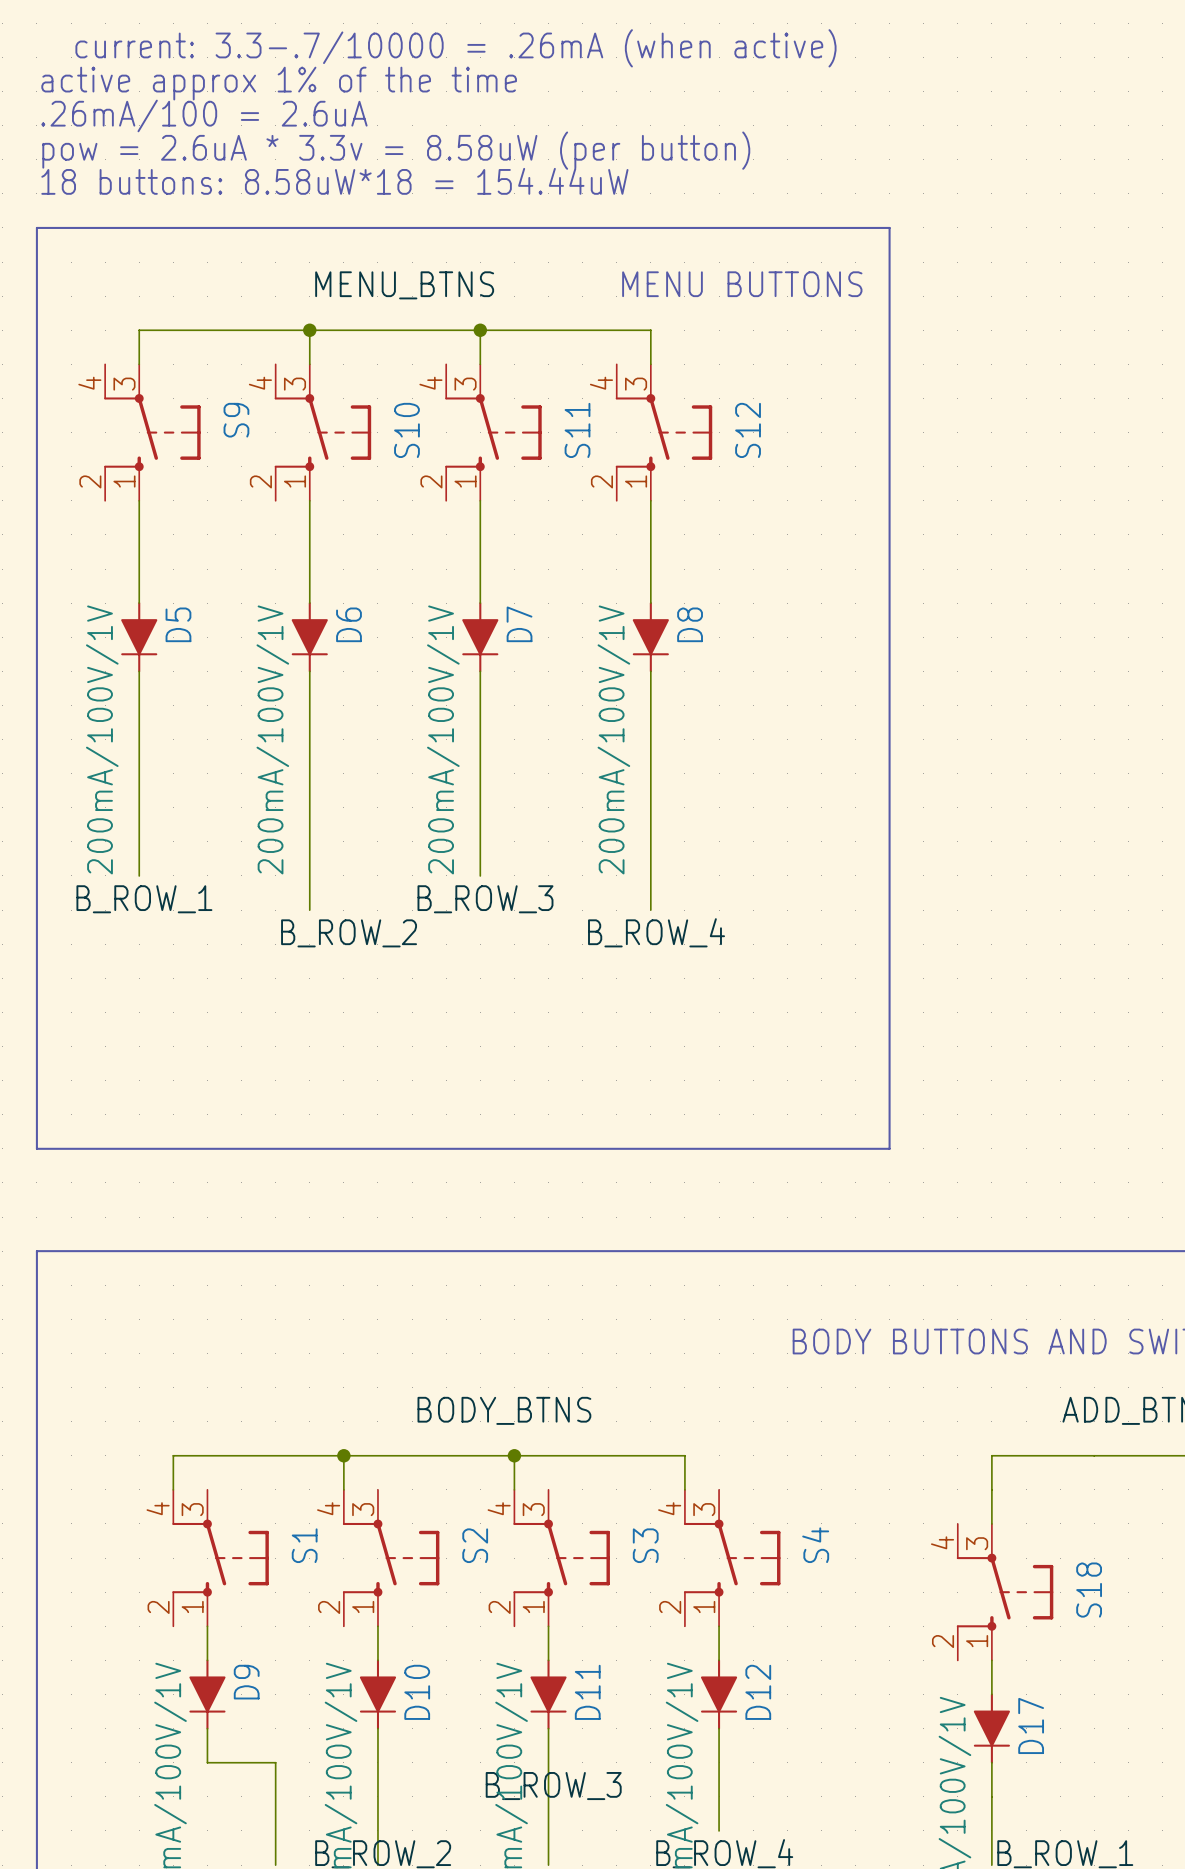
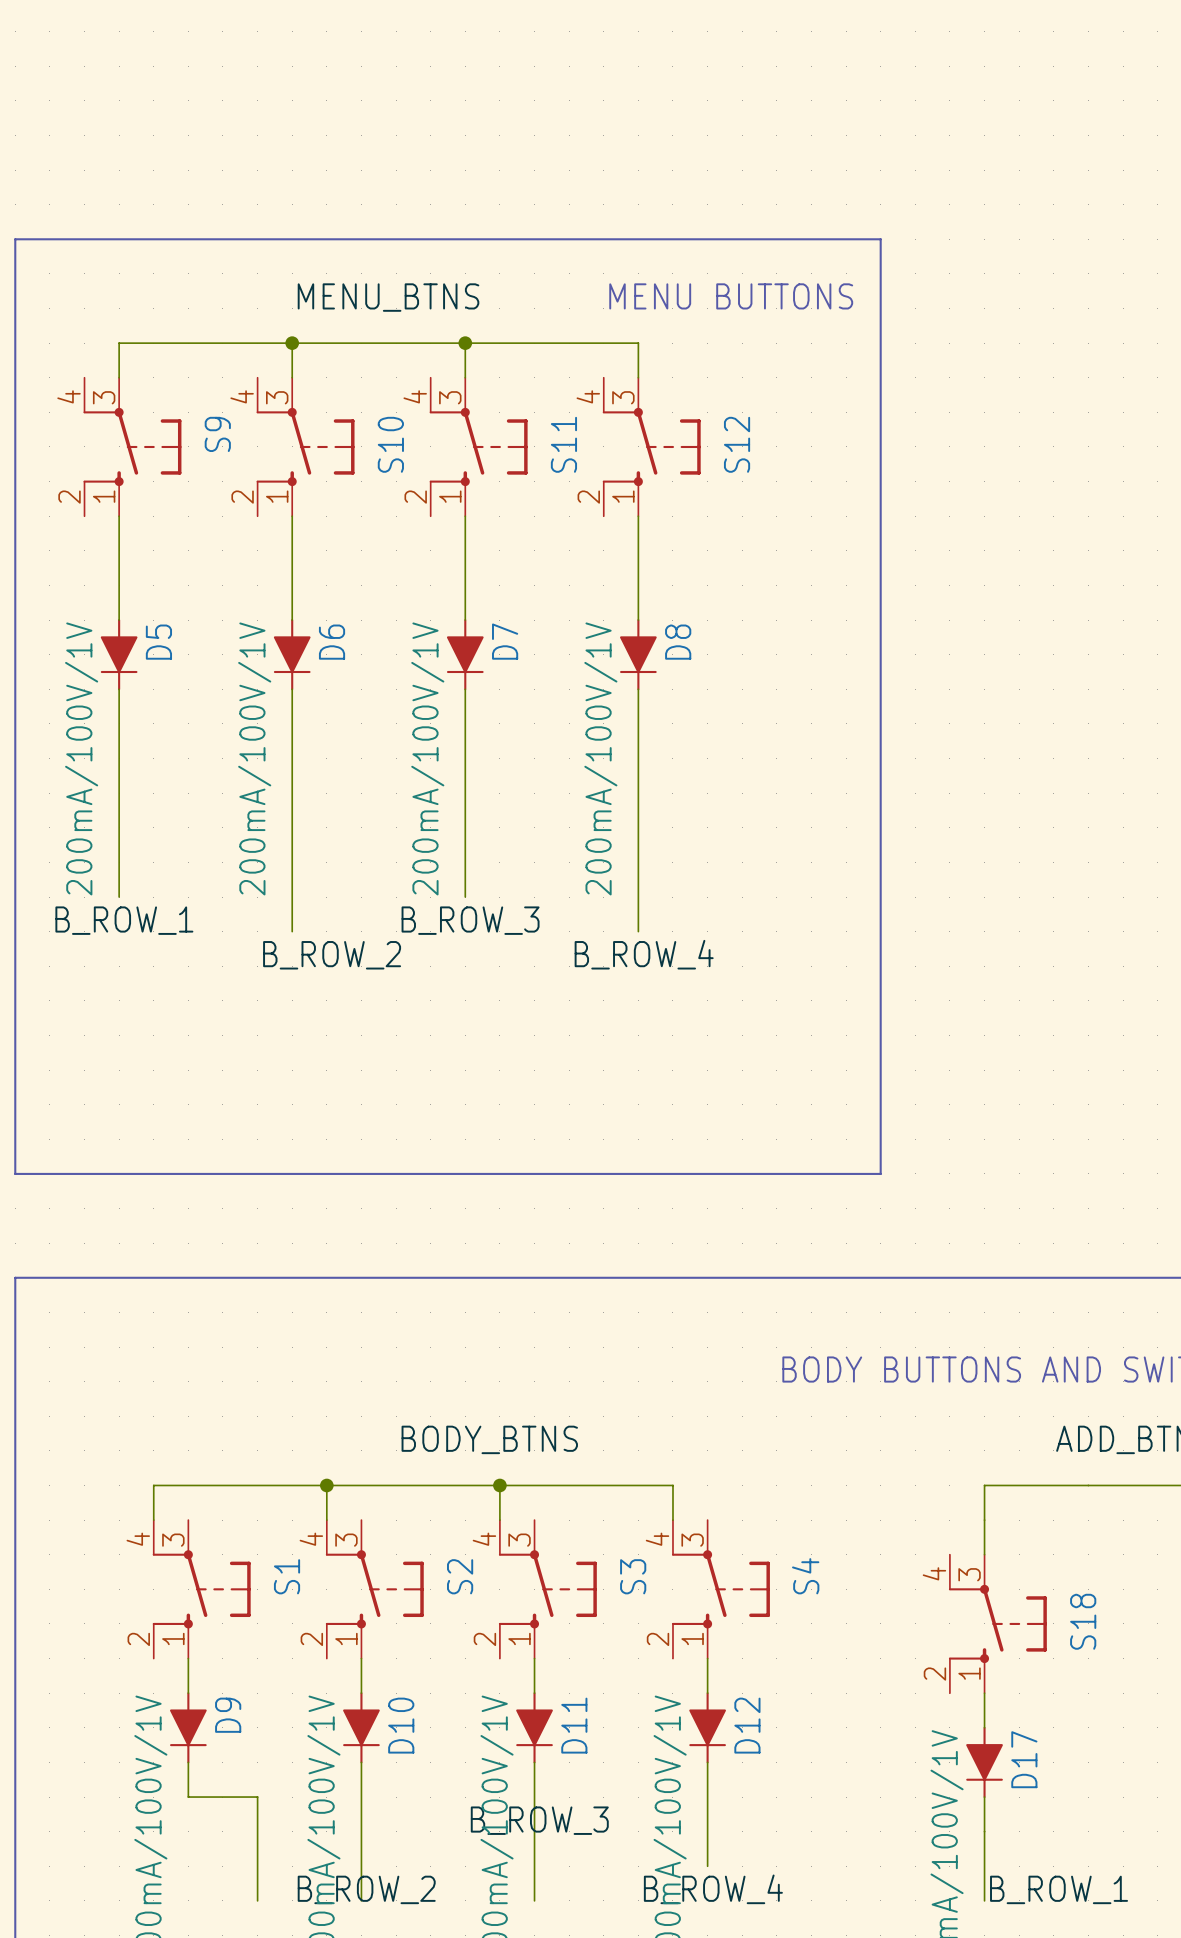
text: current: 3.3-.7/10000 = .26mA (when active) (455, 48) -> none
text: active approx 1% of the time (279, 83) -> none
text: .26mA/100 = 2.6uA (204, 115) -> none
text: pow = 2.6uA * 3.3v = 8.58uW (per button) (396, 150) -> none
text: 18 buttons: 8.58uW*18 = 154.44uW (334, 181) -> none

